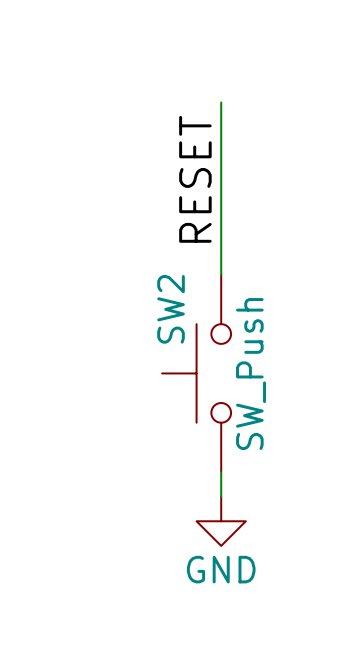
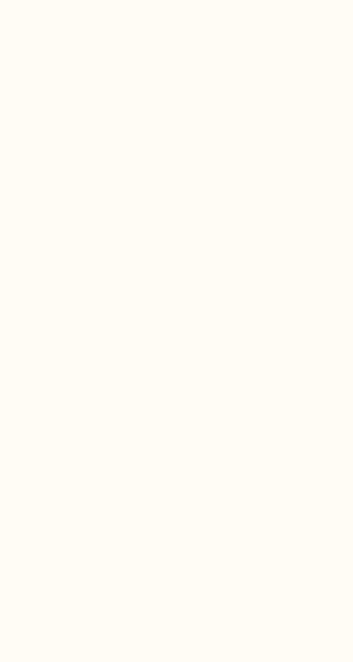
wire: (221, 102) (221, 274) -> none
label: RESET (195, 179) -> none
SW2: SW_Push (196, 373) -> none
wire: (221, 471) (221, 496) -> none
power symbol: GND (221, 521) -> none

